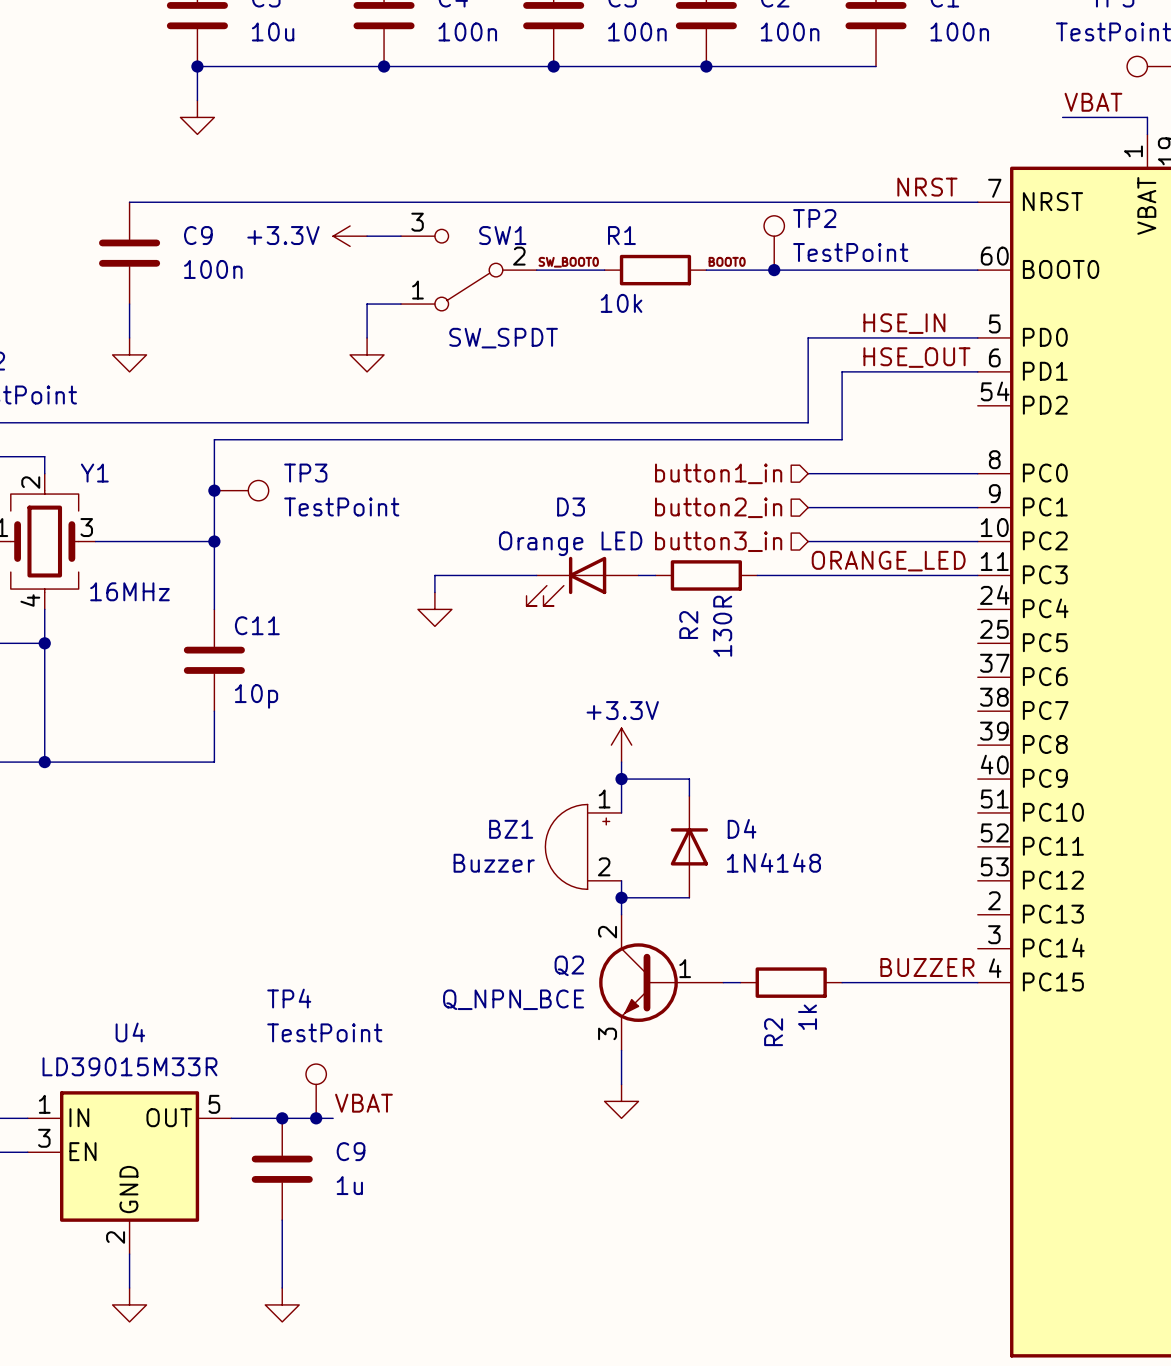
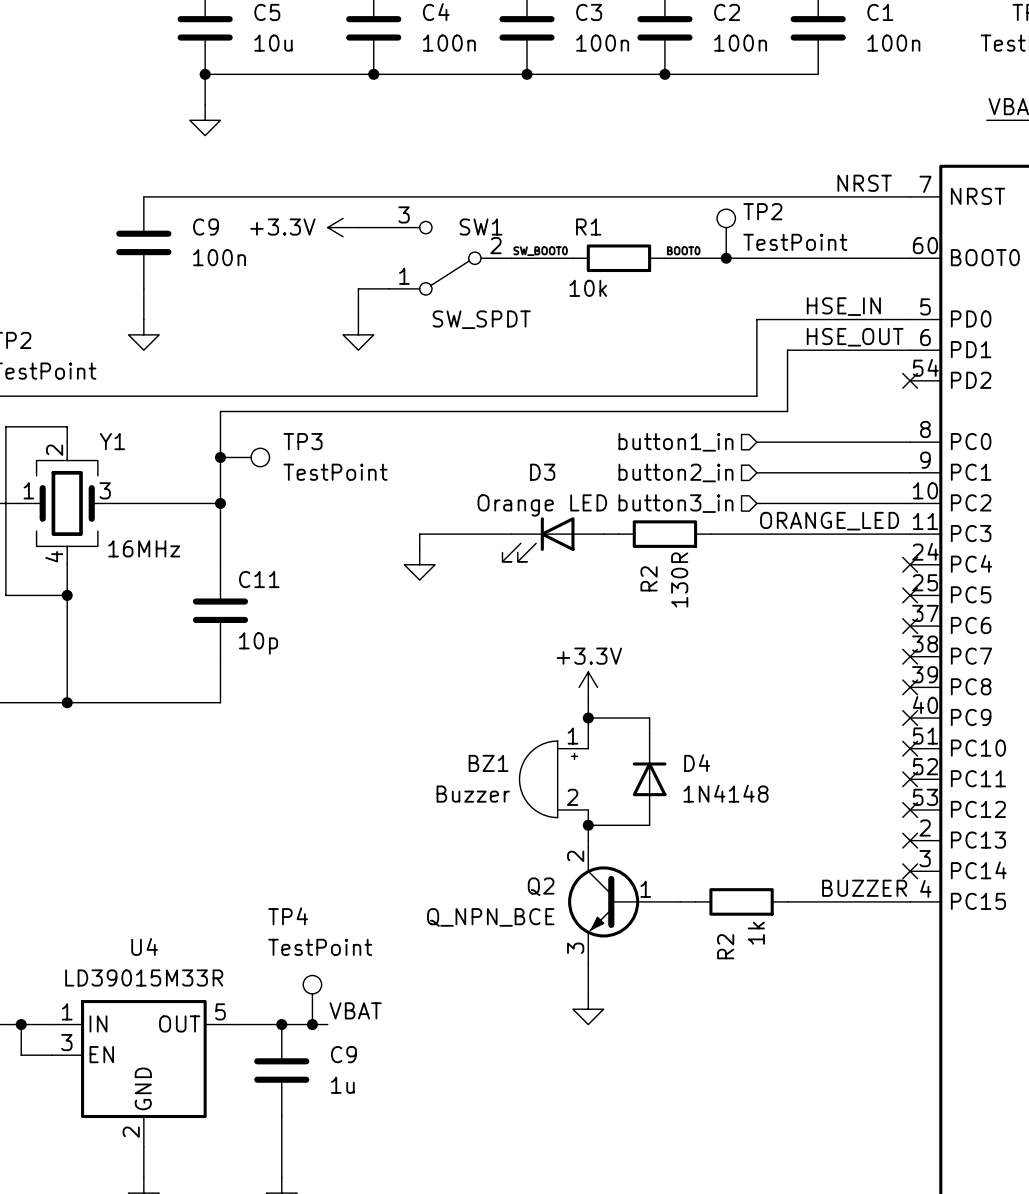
no-connect mark: none -> (910, 380)
no-connect mark: none -> (910, 564)
no-connect mark: none -> (910, 595)
no-connect mark: none -> (910, 626)
no-connect mark: none -> (910, 656)
no-connect mark: none -> (910, 687)
no-connect mark: none -> (910, 718)
no-connect mark: none -> (910, 748)
no-connect mark: none -> (910, 779)
no-connect mark: none -> (910, 809)
no-connect mark: none -> (910, 840)
no-connect mark: none -> (910, 871)

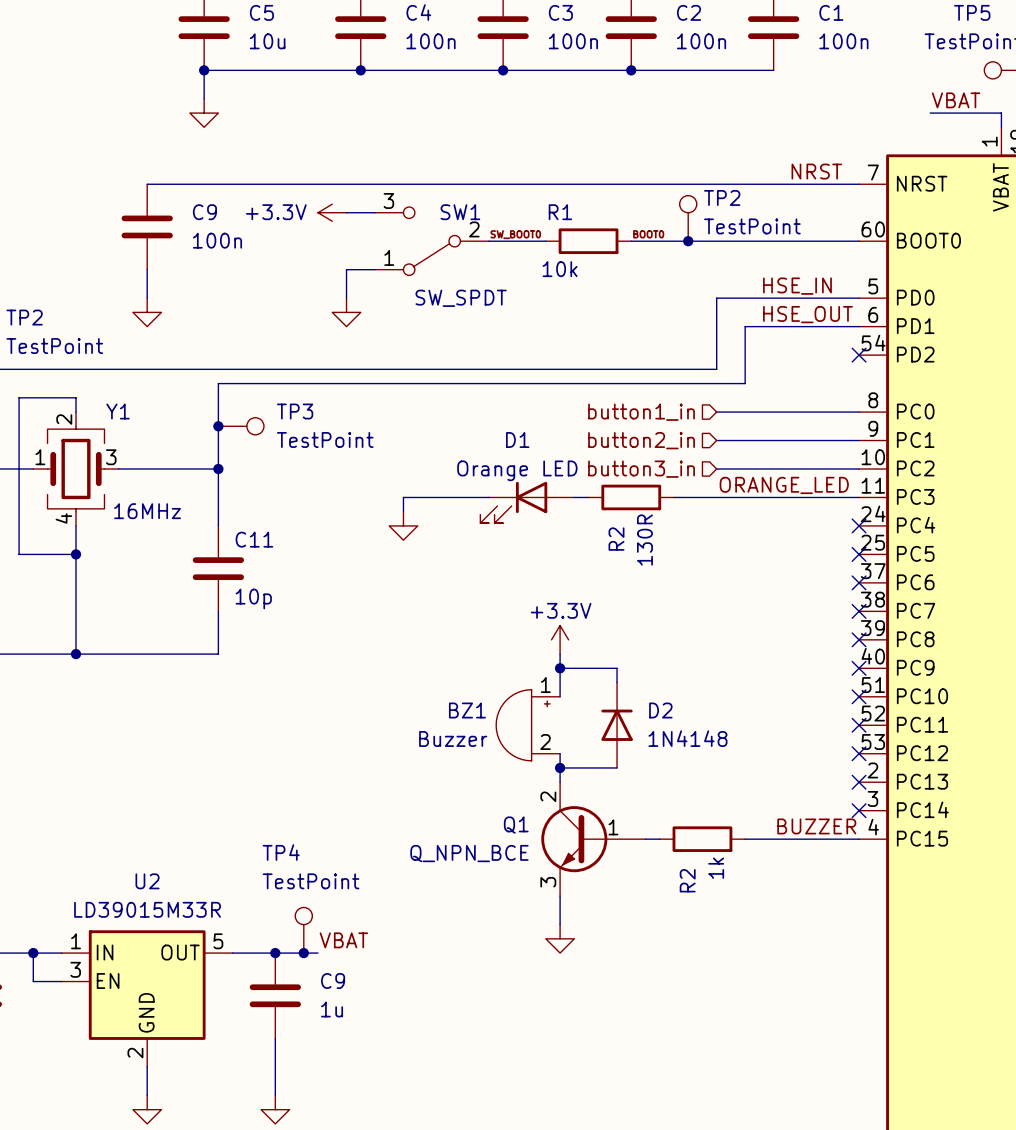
D3 name: D3 (542, 472) -> D1 (517, 439)
D4 name: D4 (697, 763) -> D2 (660, 710)
Q2 name: Q2 (541, 886) -> Q1 (516, 825)
U4 name: U4 (144, 946) -> U2 (147, 881)

